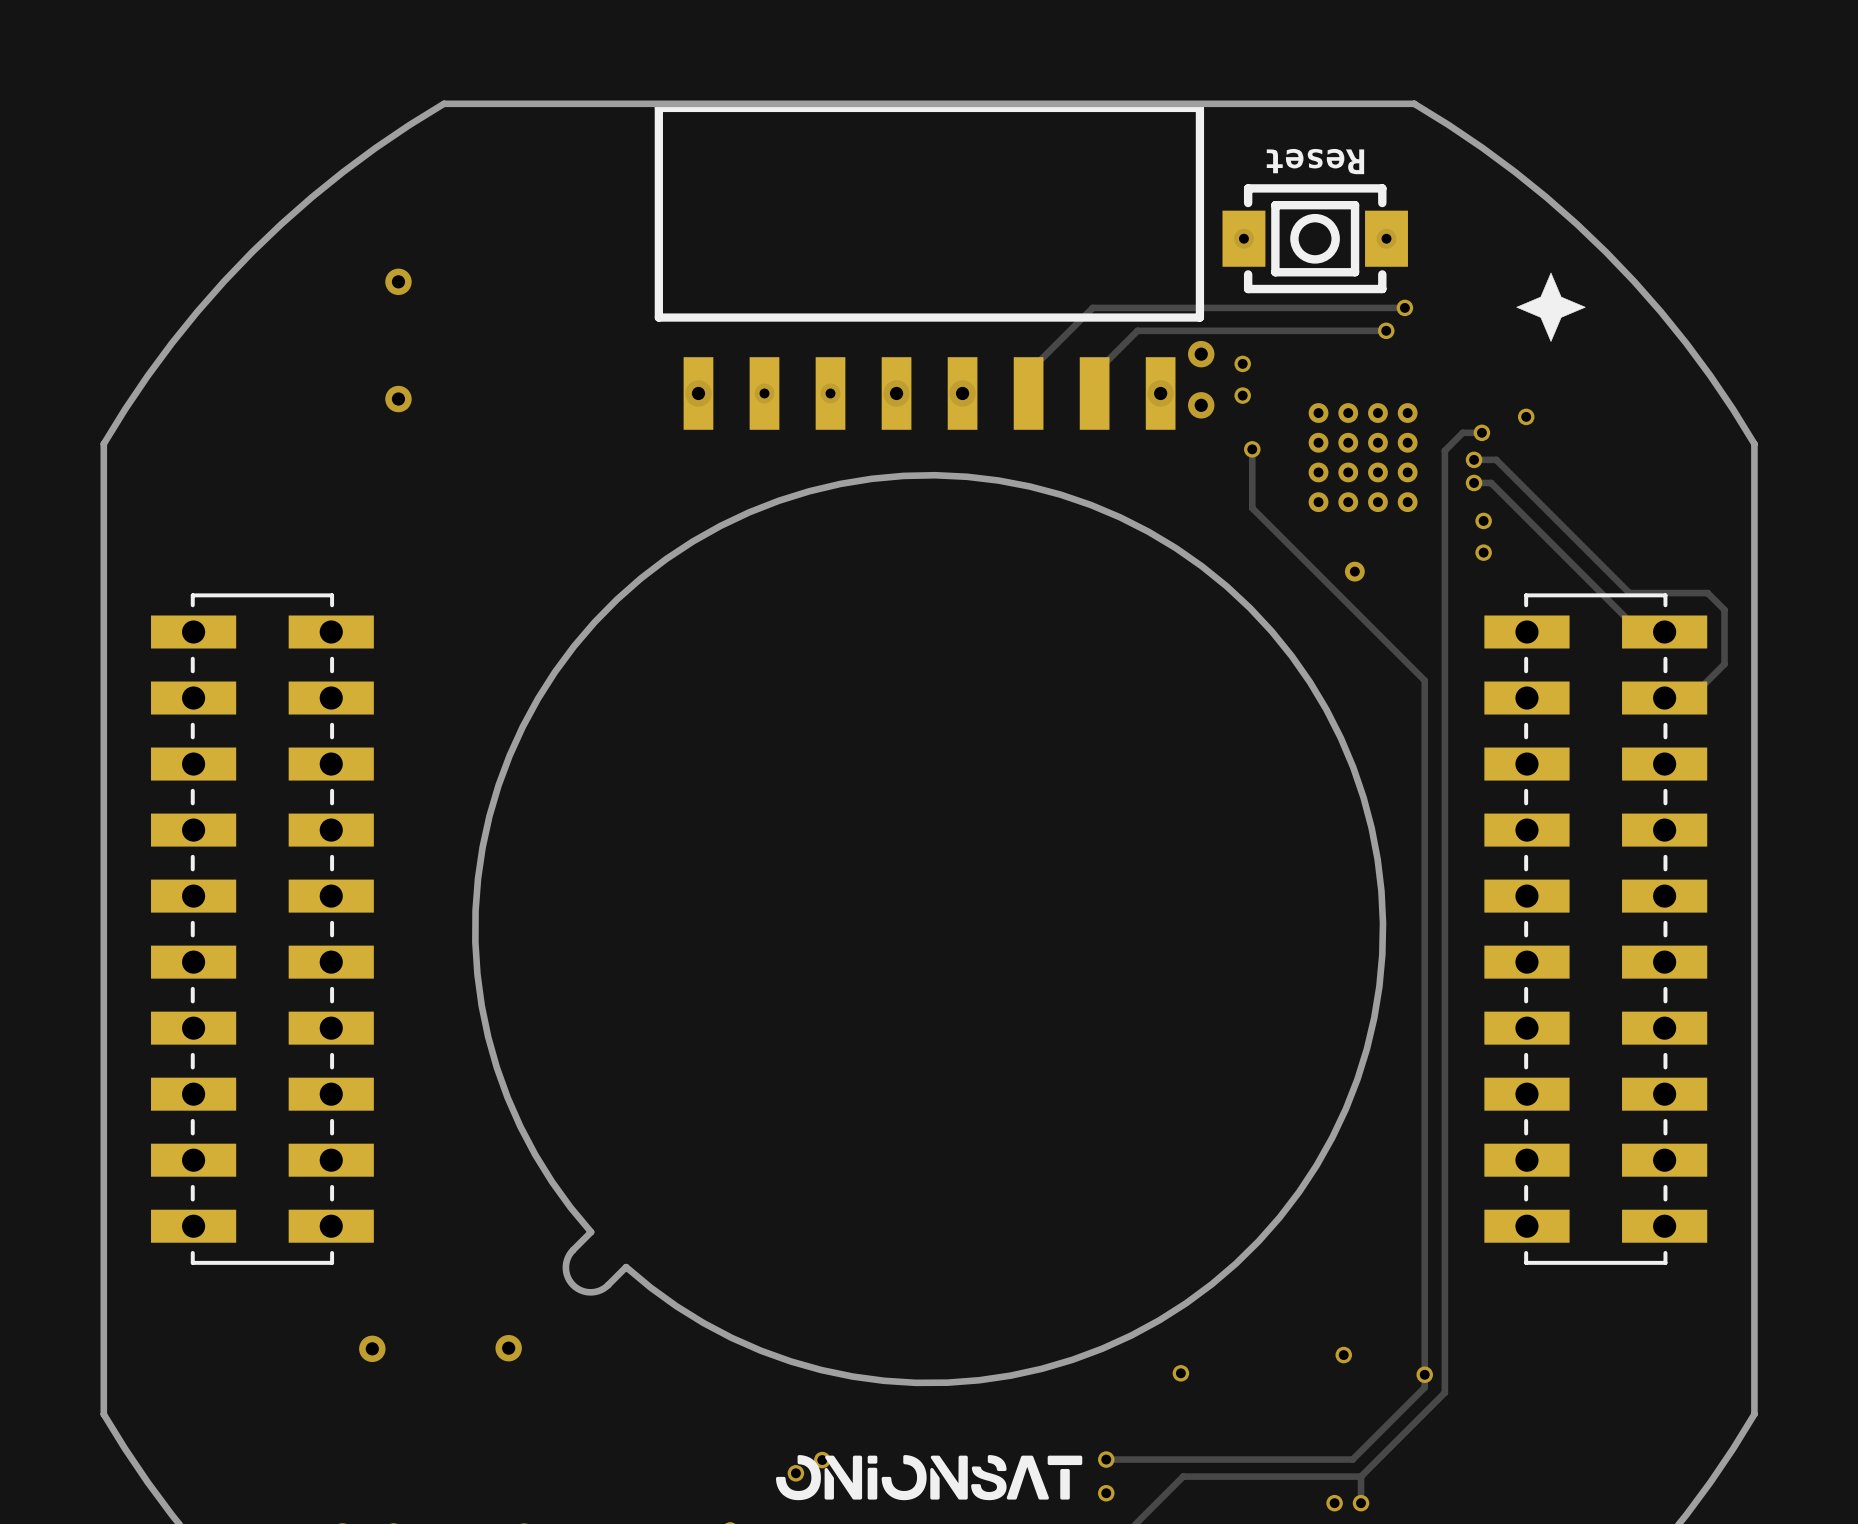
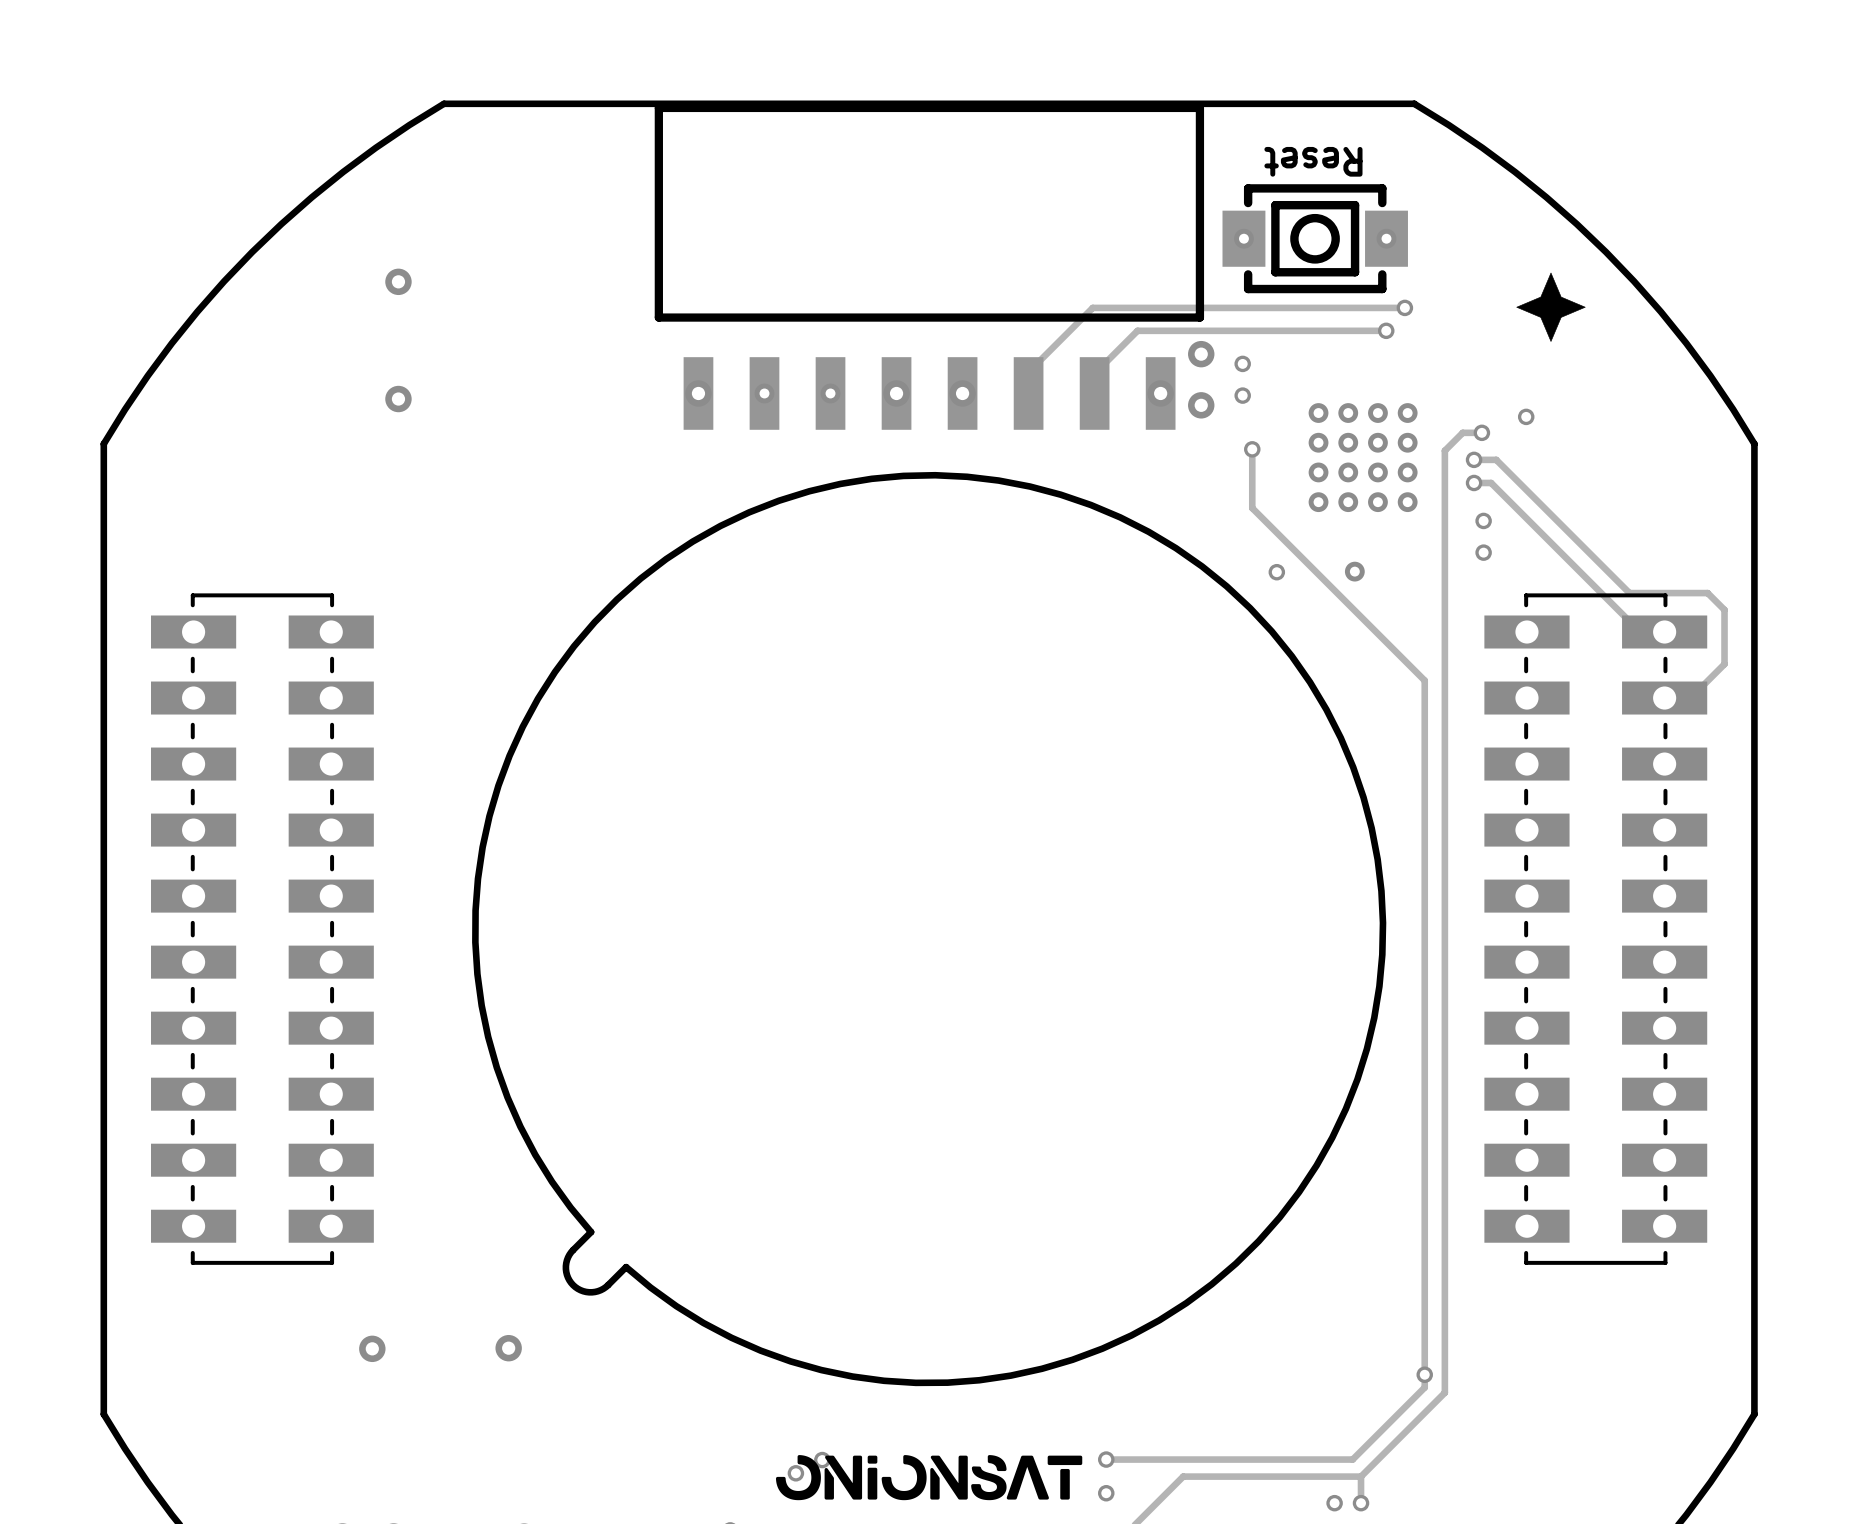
via: none -> (1276, 572)
via: (1343, 1355) -> none
via: (1180, 1373) -> none

